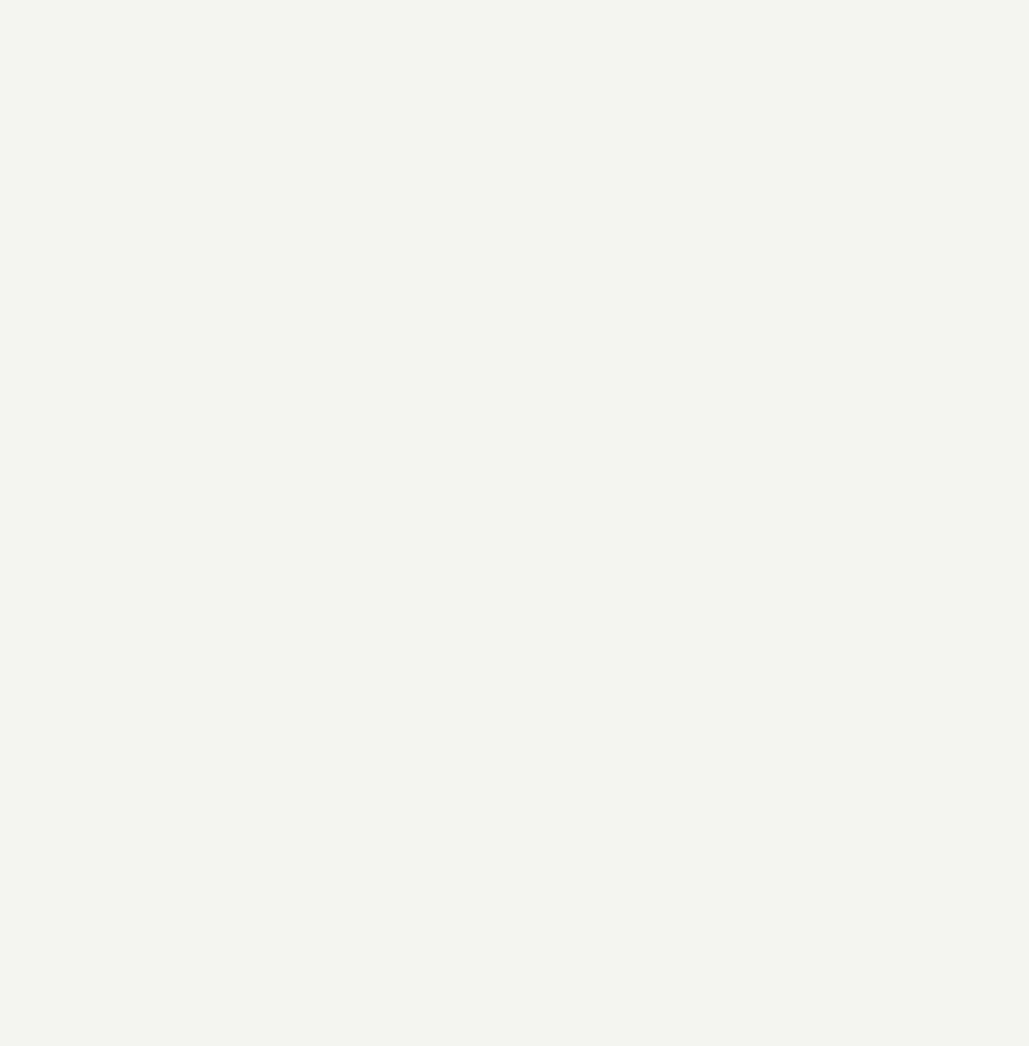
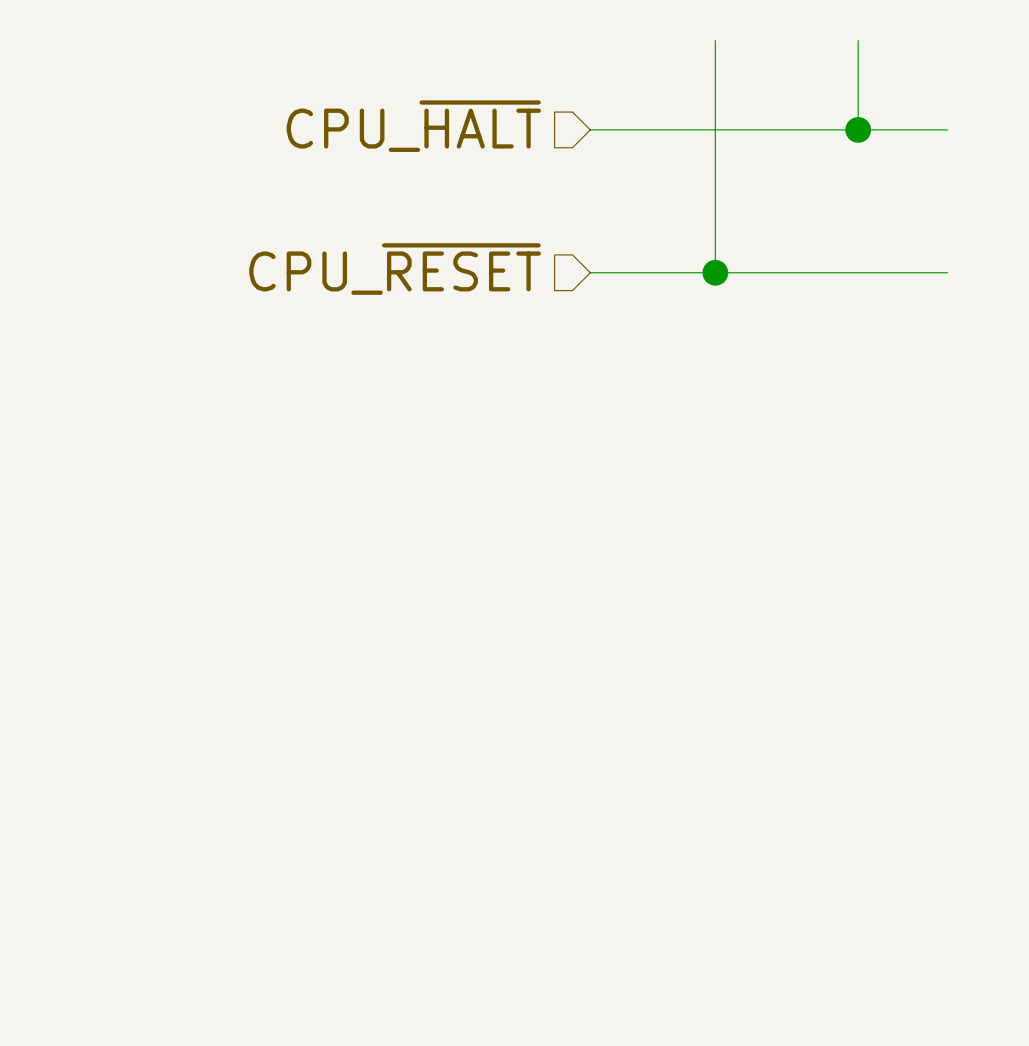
wire: none -> (715, 40) (715, 272)
wire: none -> (858, 40) (858, 129)
hierarchical label: none -> CPU_~{HALT} (413, 126)
wire: none -> (590, 129) (947, 129)
junction: none -> (858, 129)
hierarchical label: none -> CPU_~{RESET} (395, 269)
wire: none -> (590, 272) (947, 272)
junction: none -> (715, 272)

